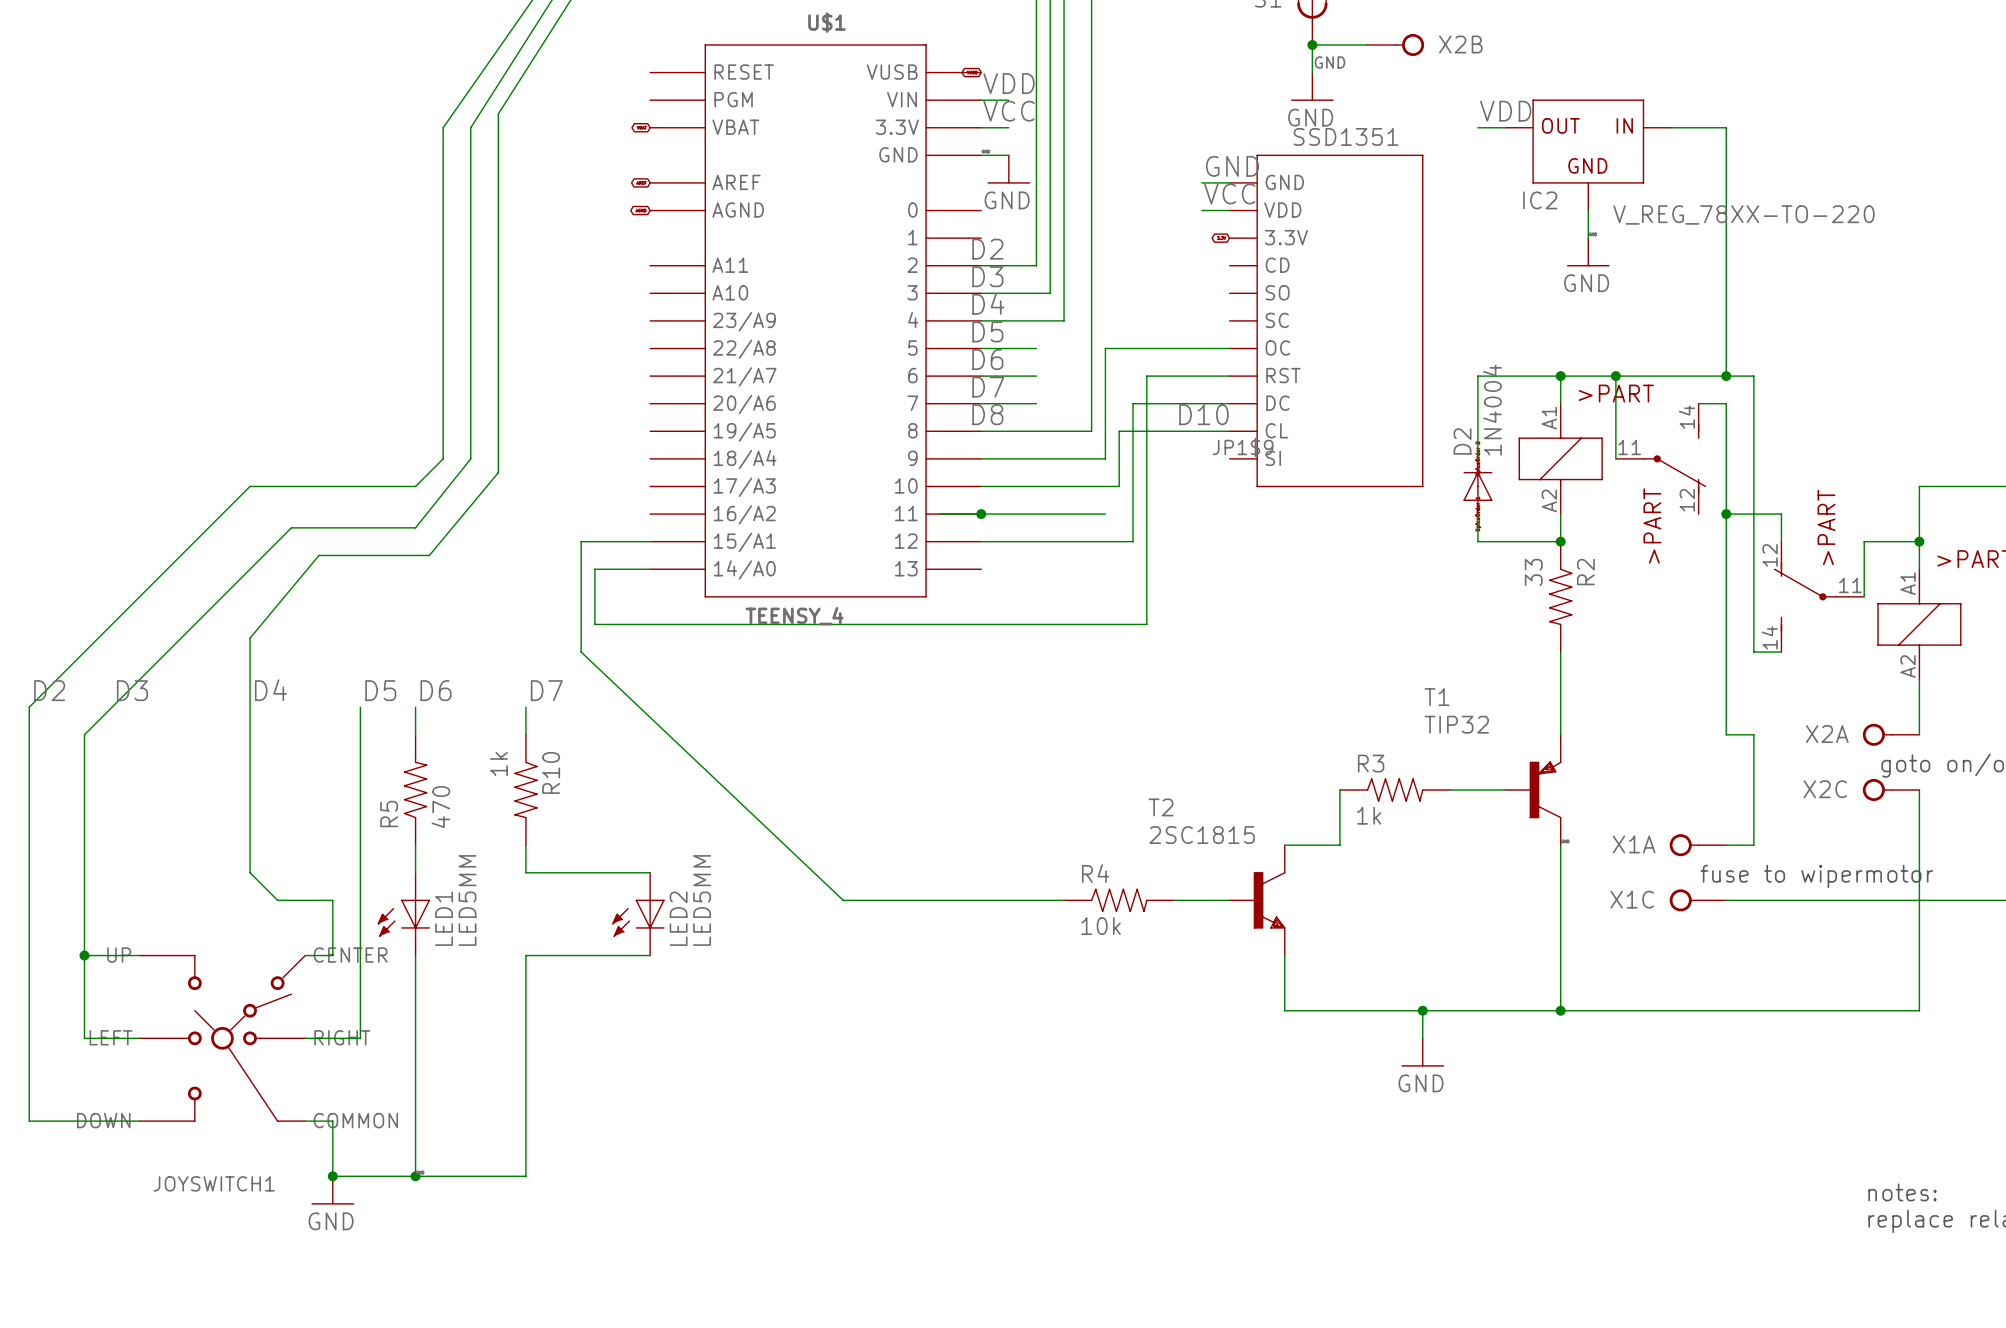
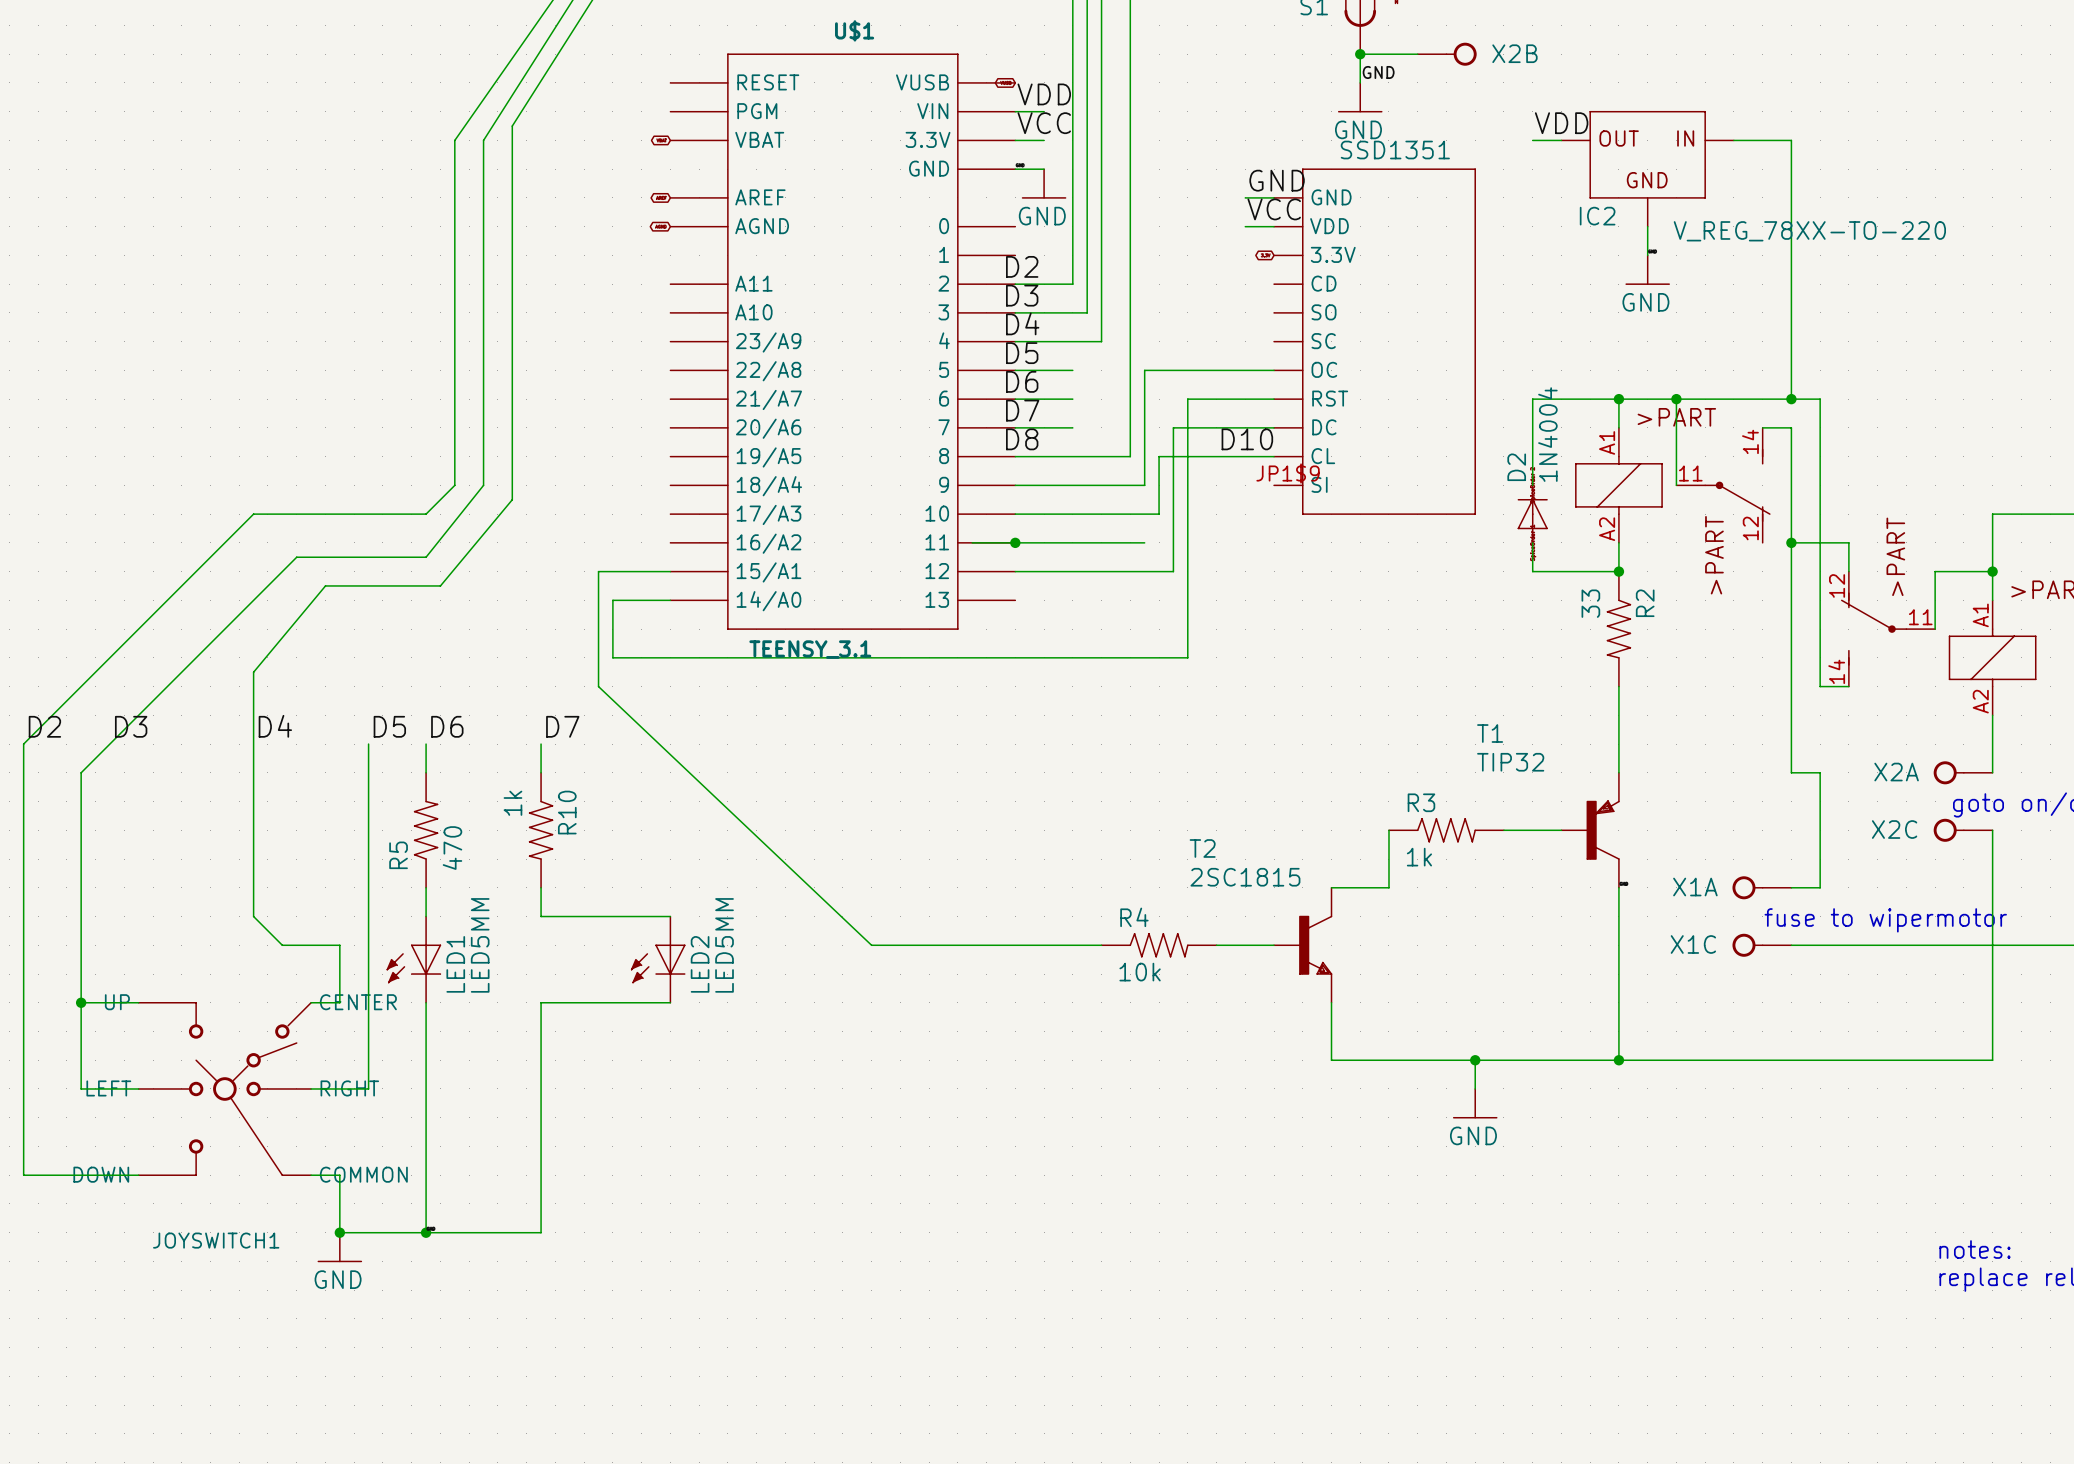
U$1 value: TEENSY_4 (794, 616) -> TEENSY_3.1 (810, 649)

